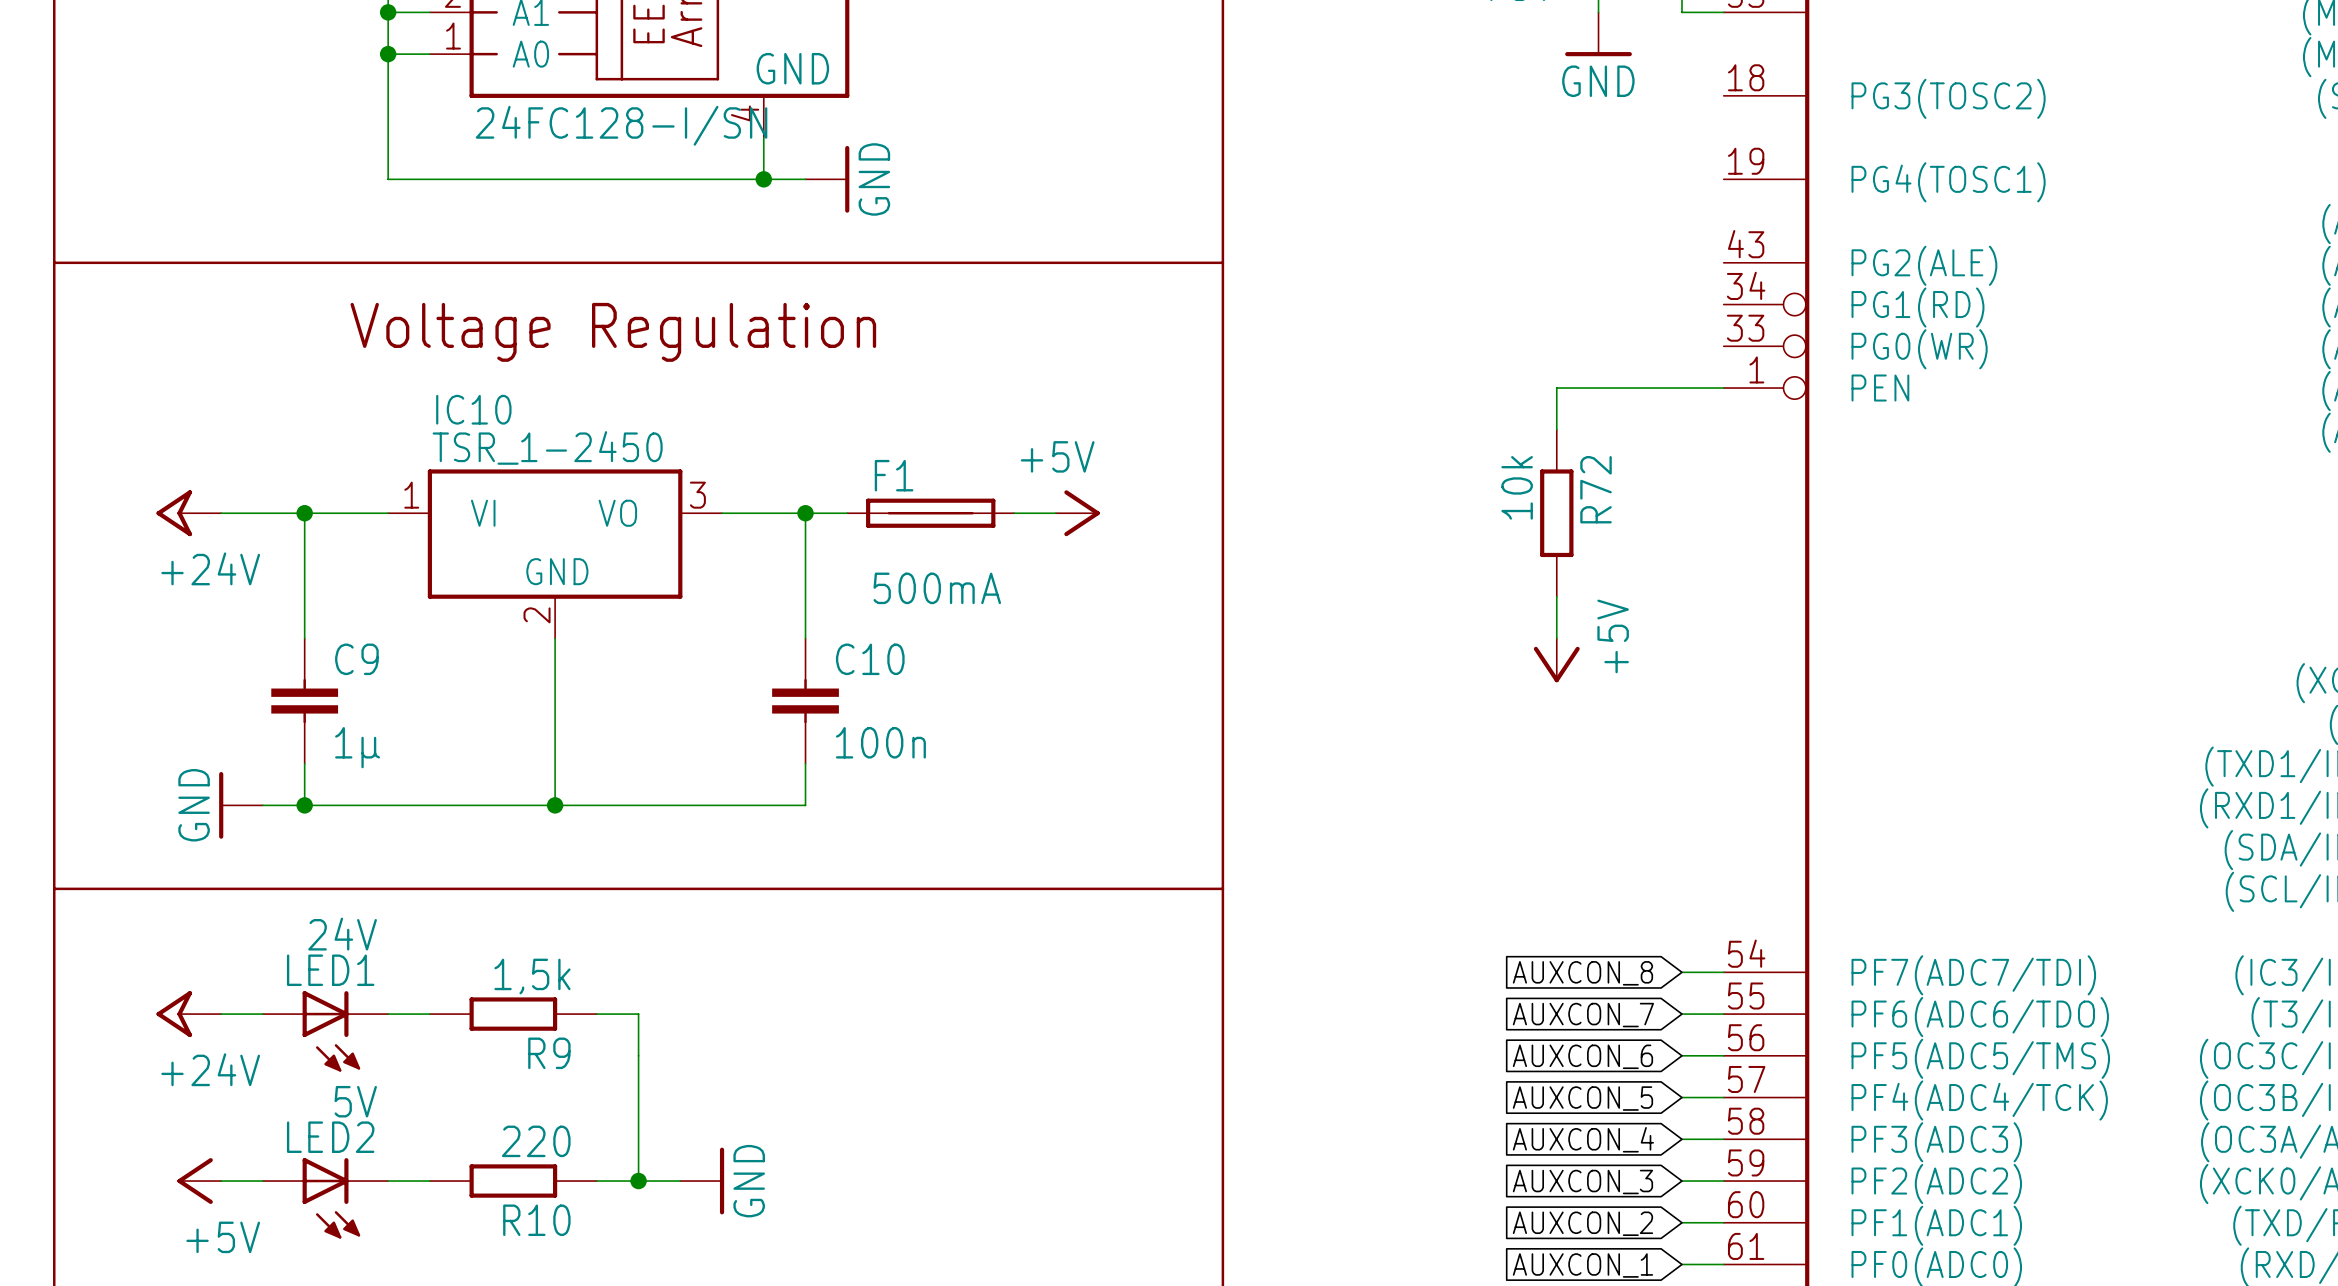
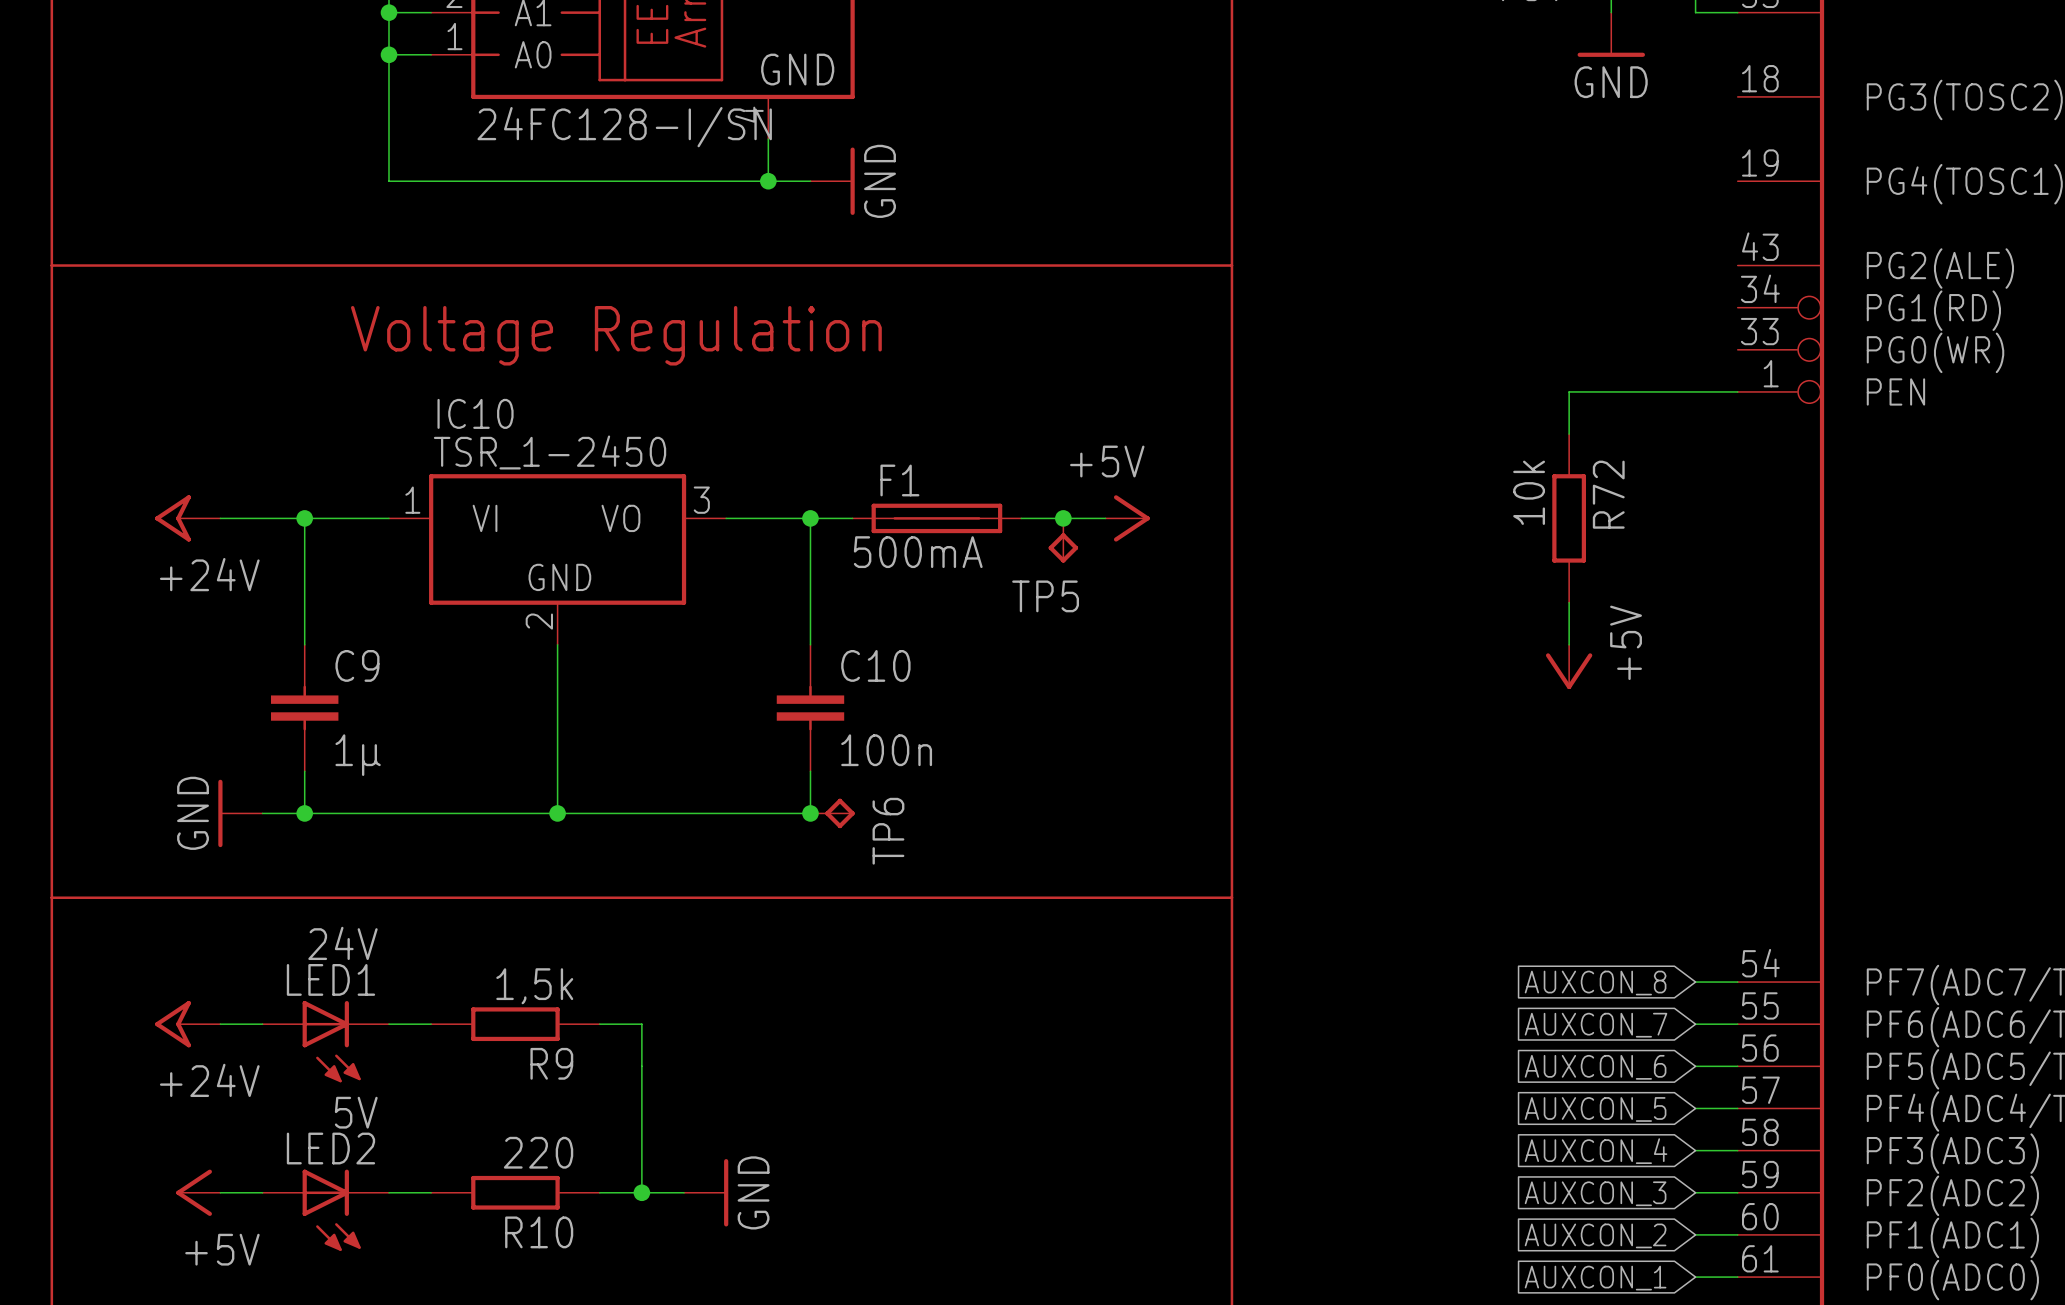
junction: none -> (1063, 518)
power symbol position: +5V (1077, 513) -> +5V (1127, 518)
TP5: none -> (1063, 540)
F1 value position: 500mA (937, 588) -> 500mA (918, 552)
junction: none -> (810, 813)
TP6: none -> (832, 813)

